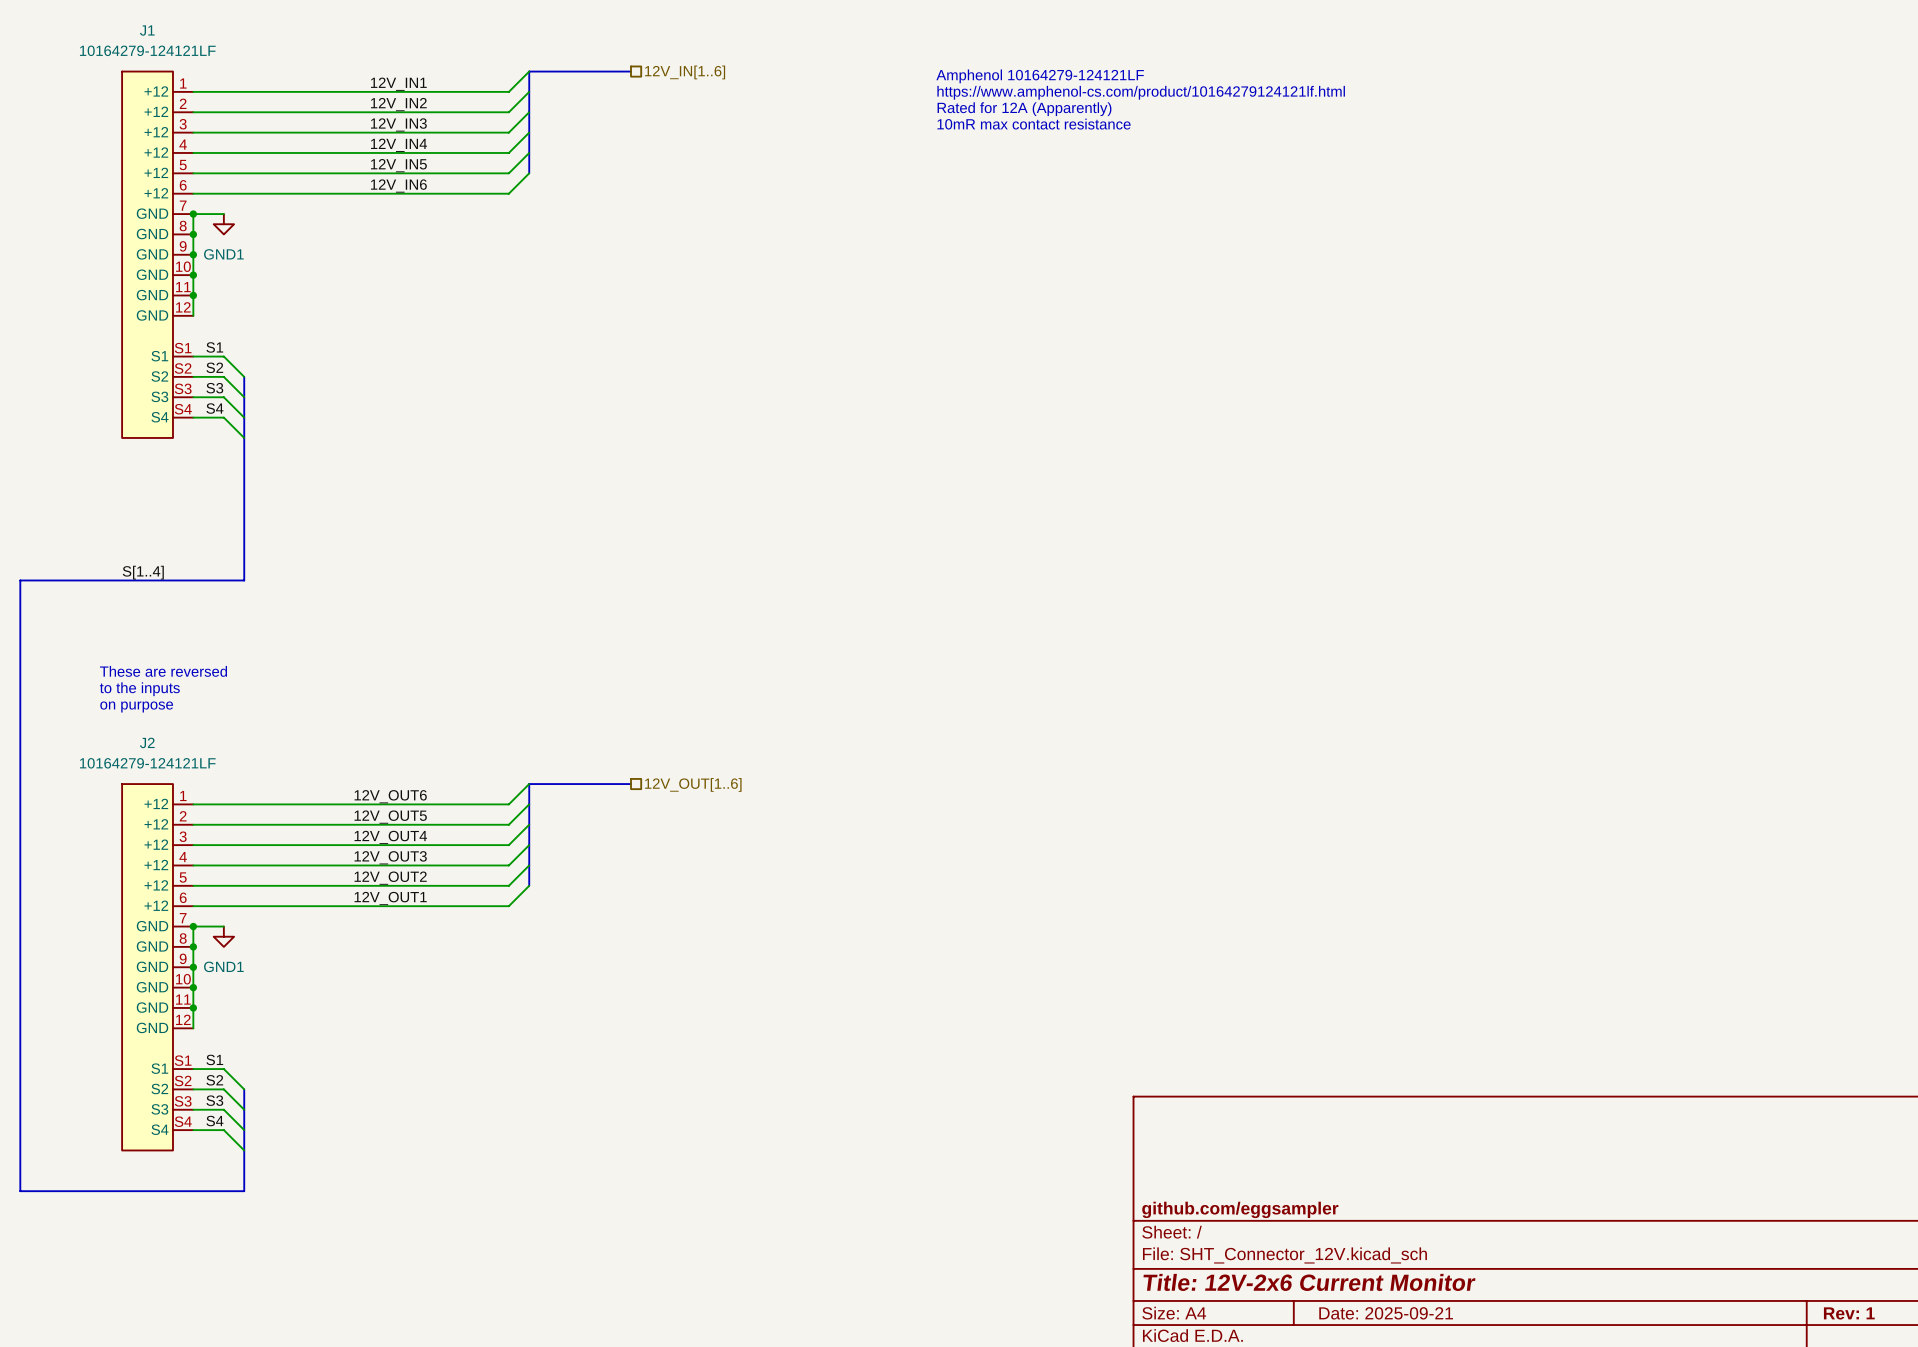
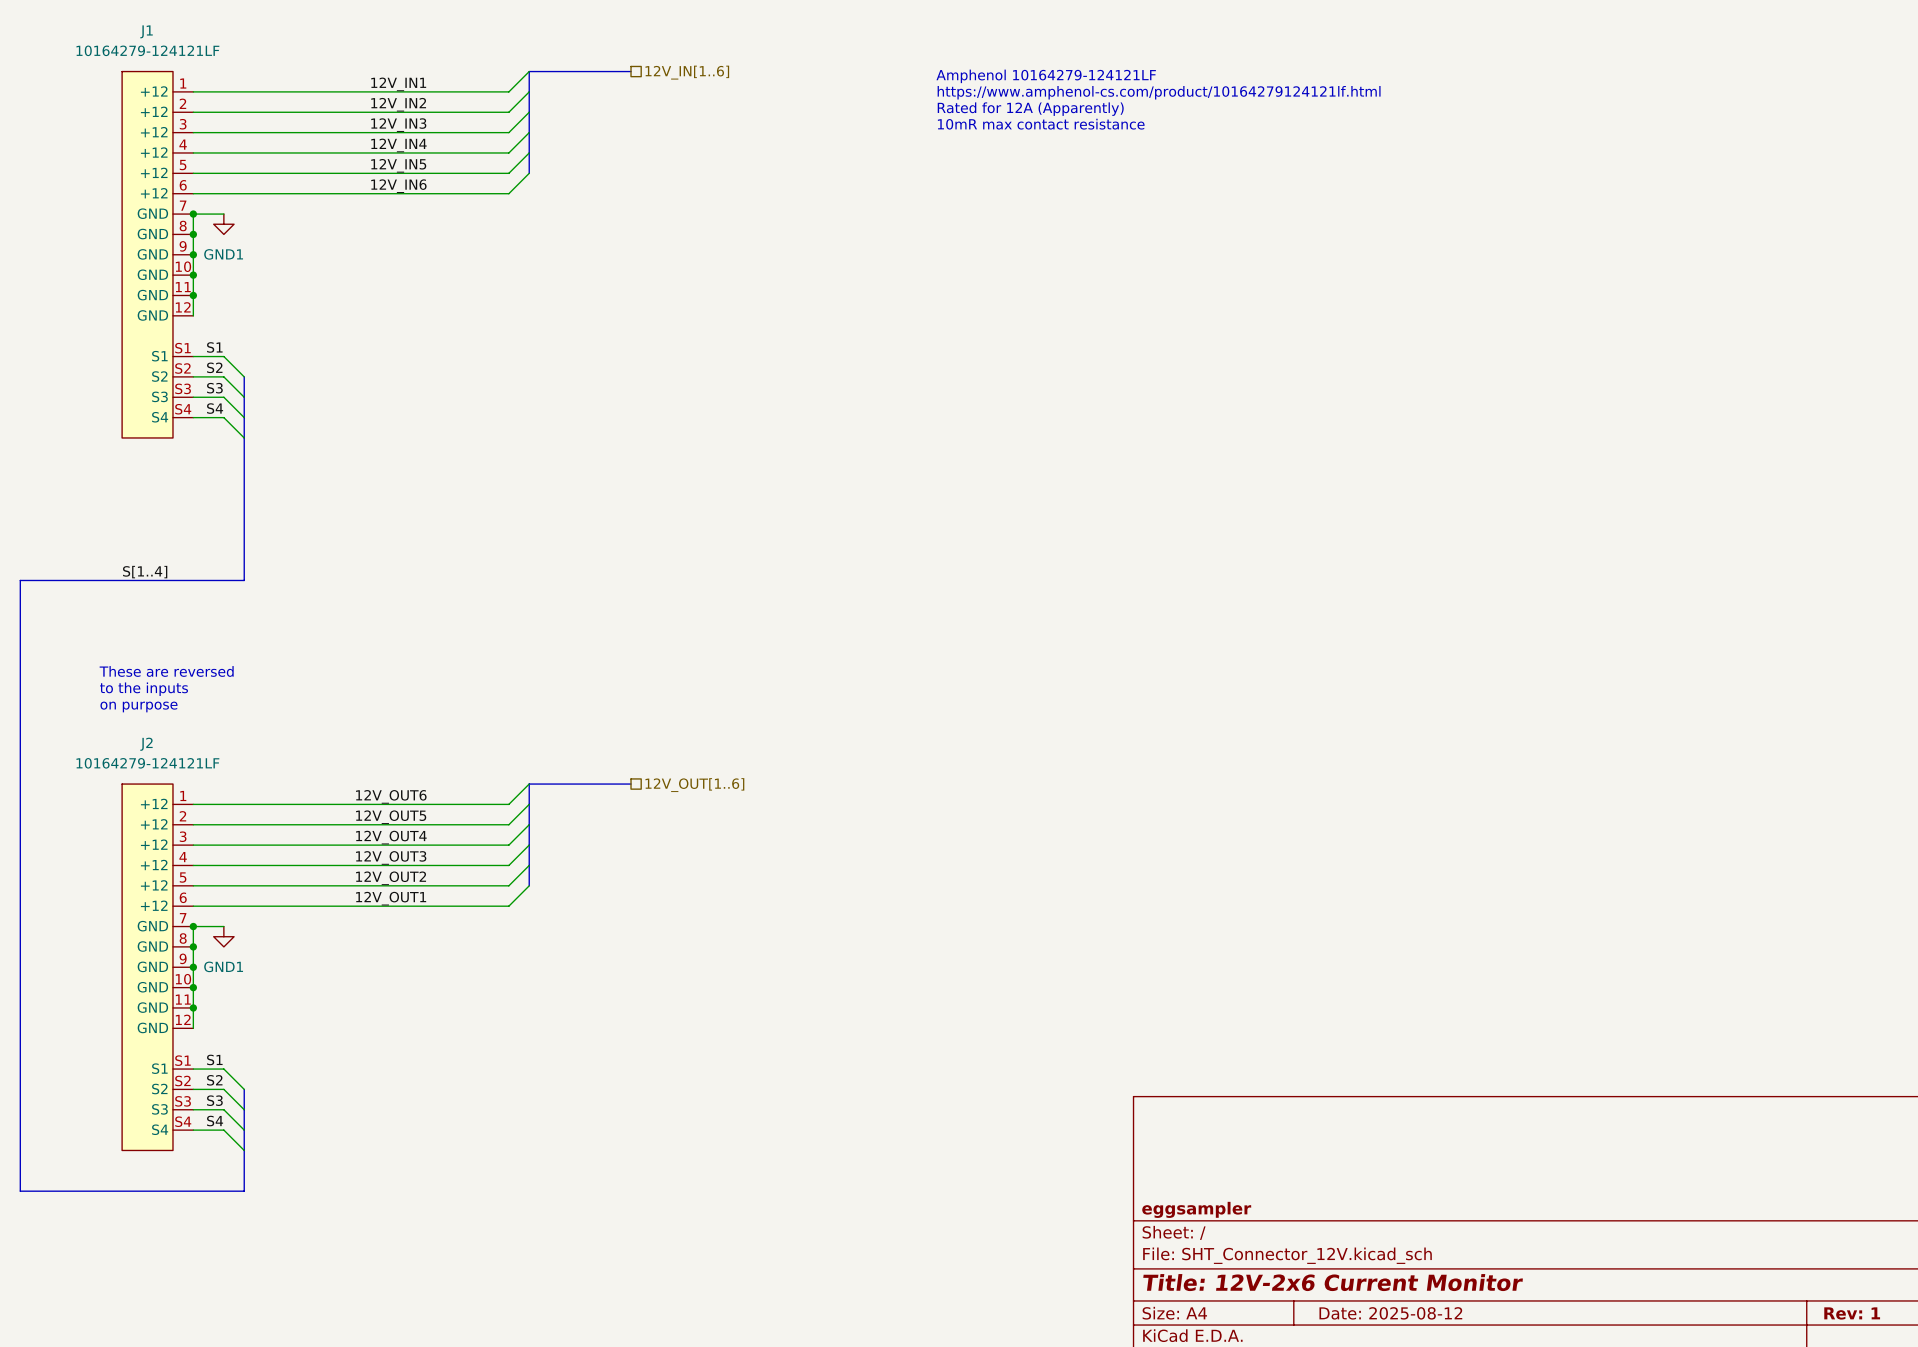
title block: github.com/eggsampler (1240, 1209) -> eggsampler (1196, 1209)
title block: Date: 2025-09-21 (1386, 1313) -> Date: 2025-08-12 (1390, 1313)

